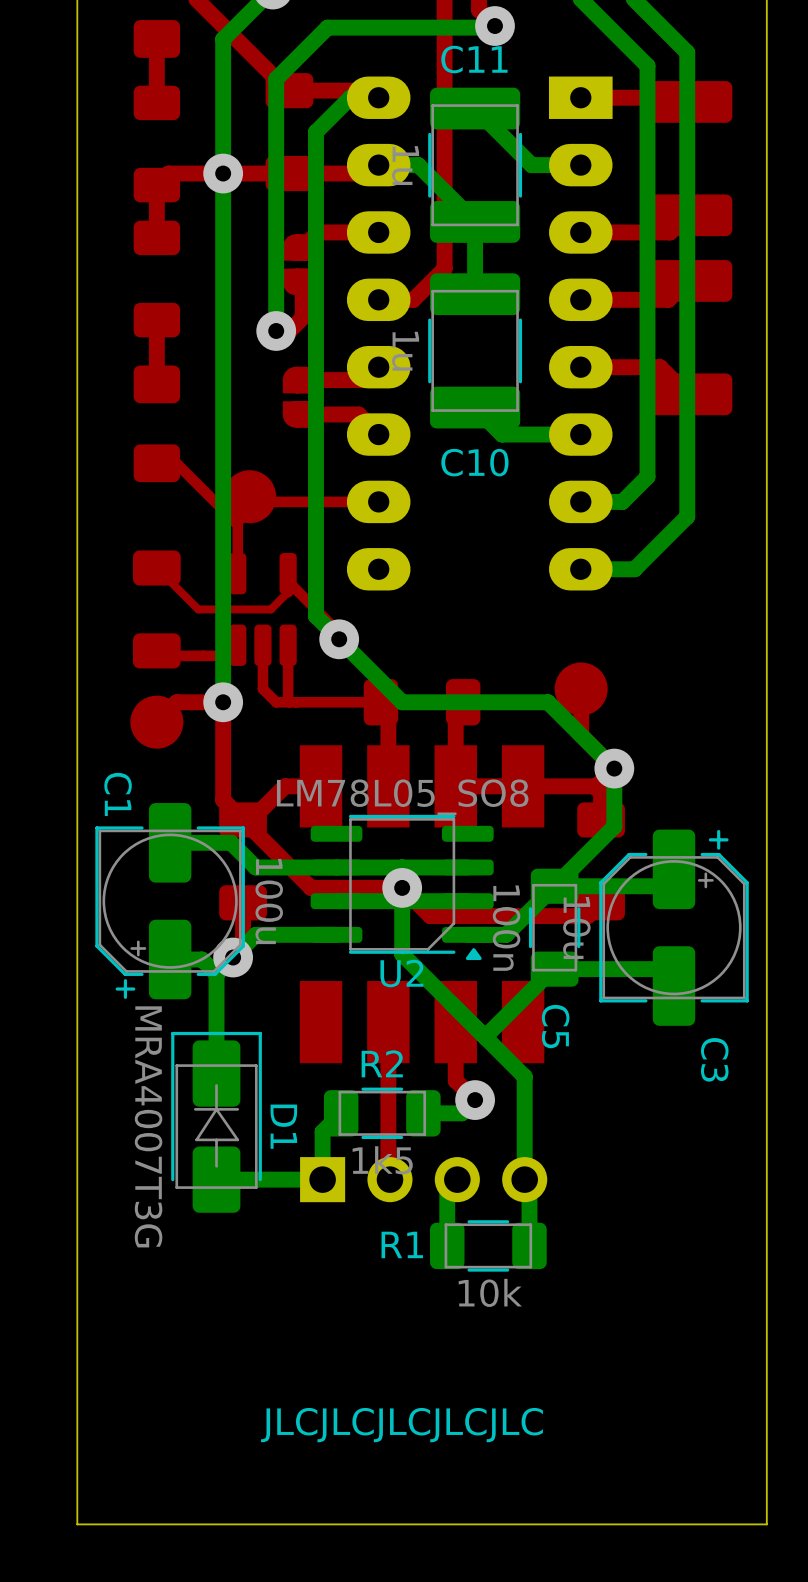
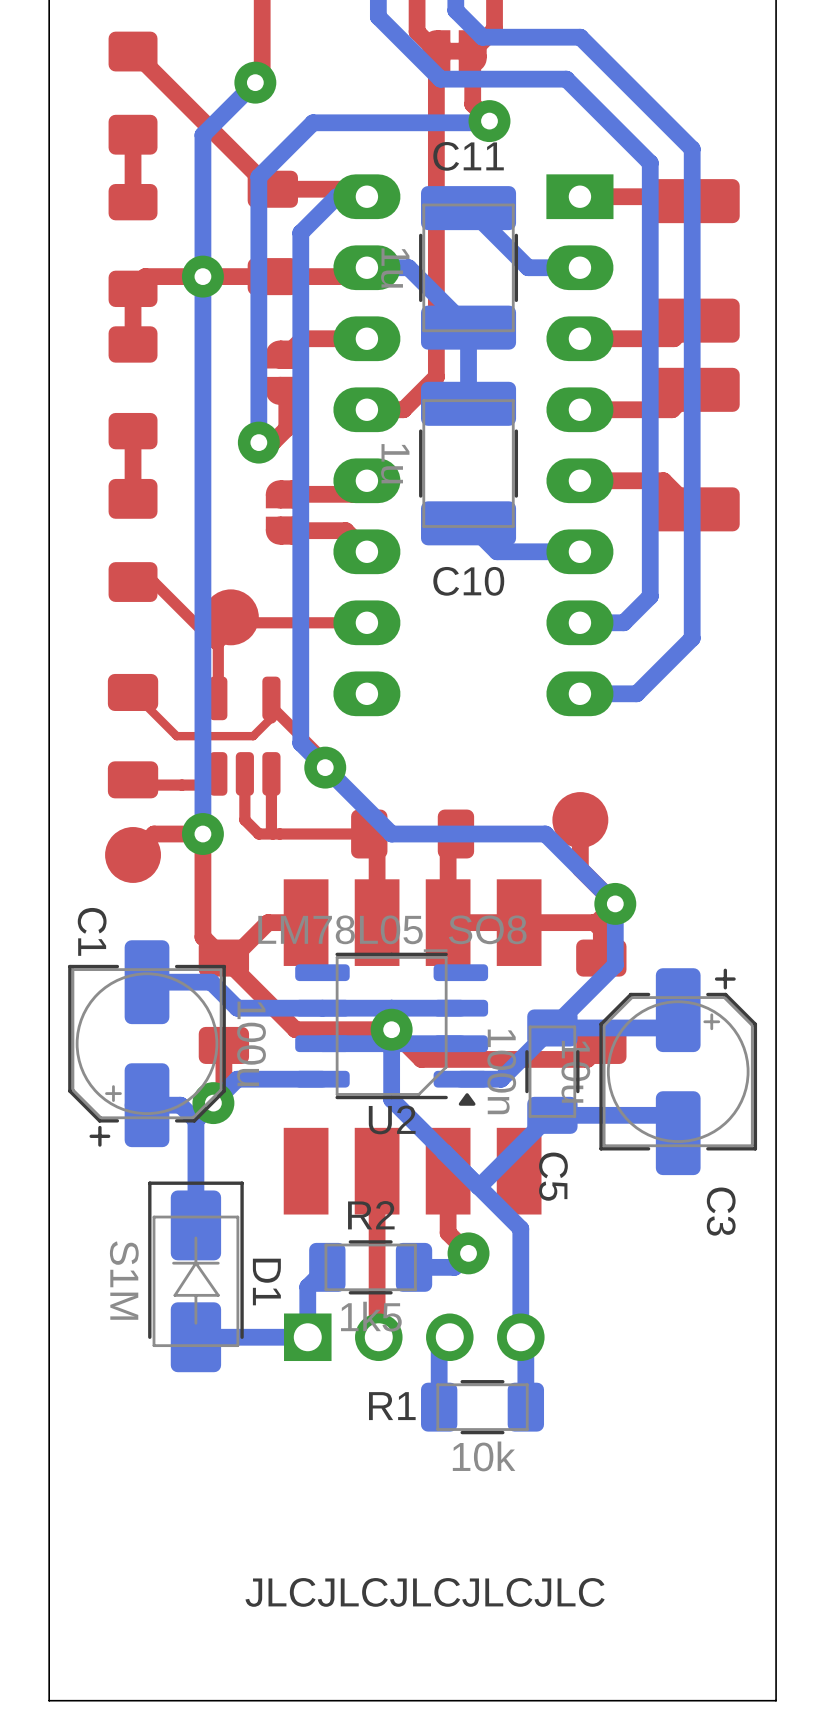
D1 value: MRA4007T3G (148, 1126) -> S1M (124, 1280)

